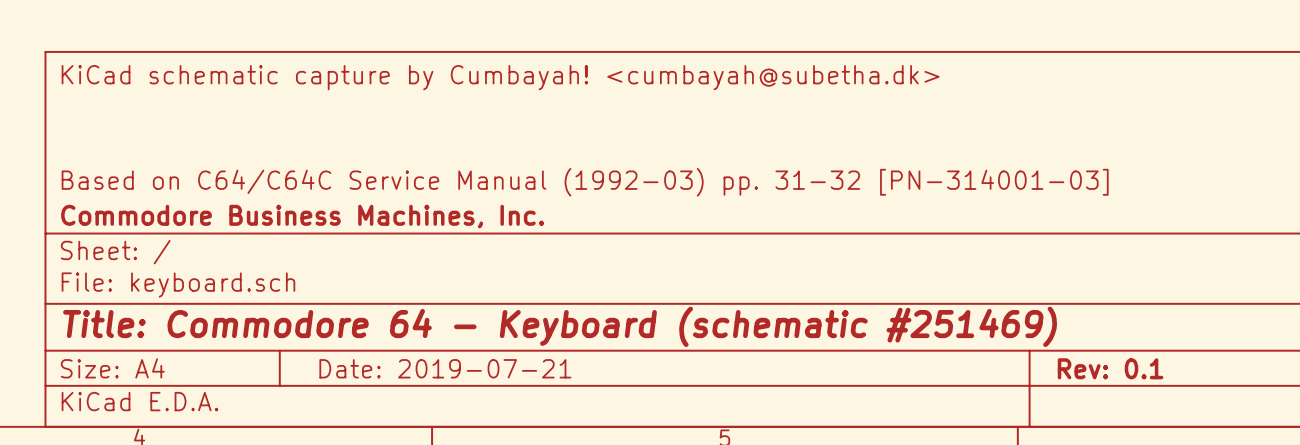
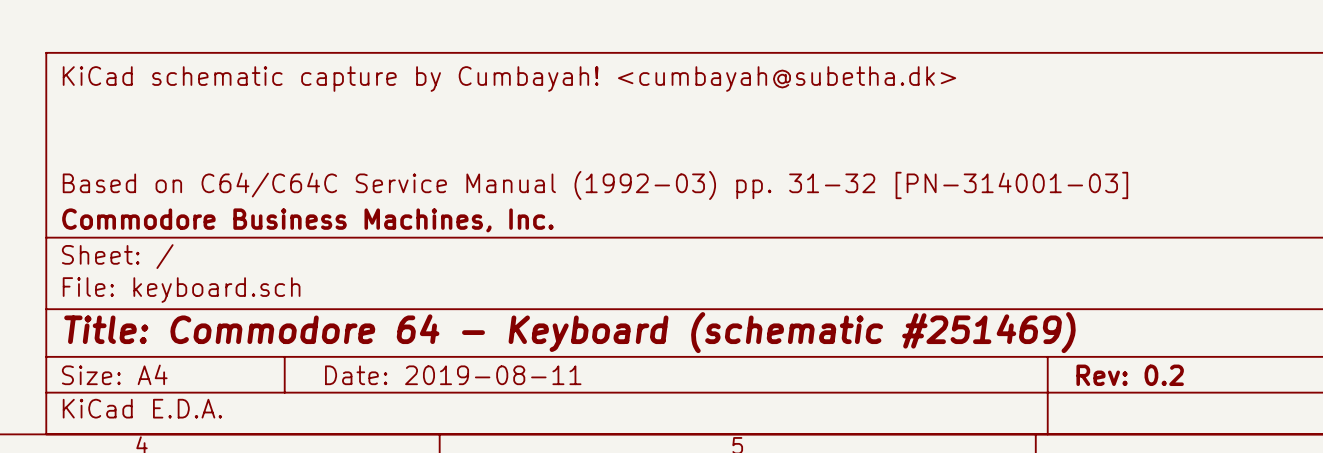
title block: Date: 2019-07-21 (445, 368) -> Date: 2019-08-11 (453, 375)
title block: Rev: 0.1 (1110, 368) -> Rev: 0.2 (1130, 375)

